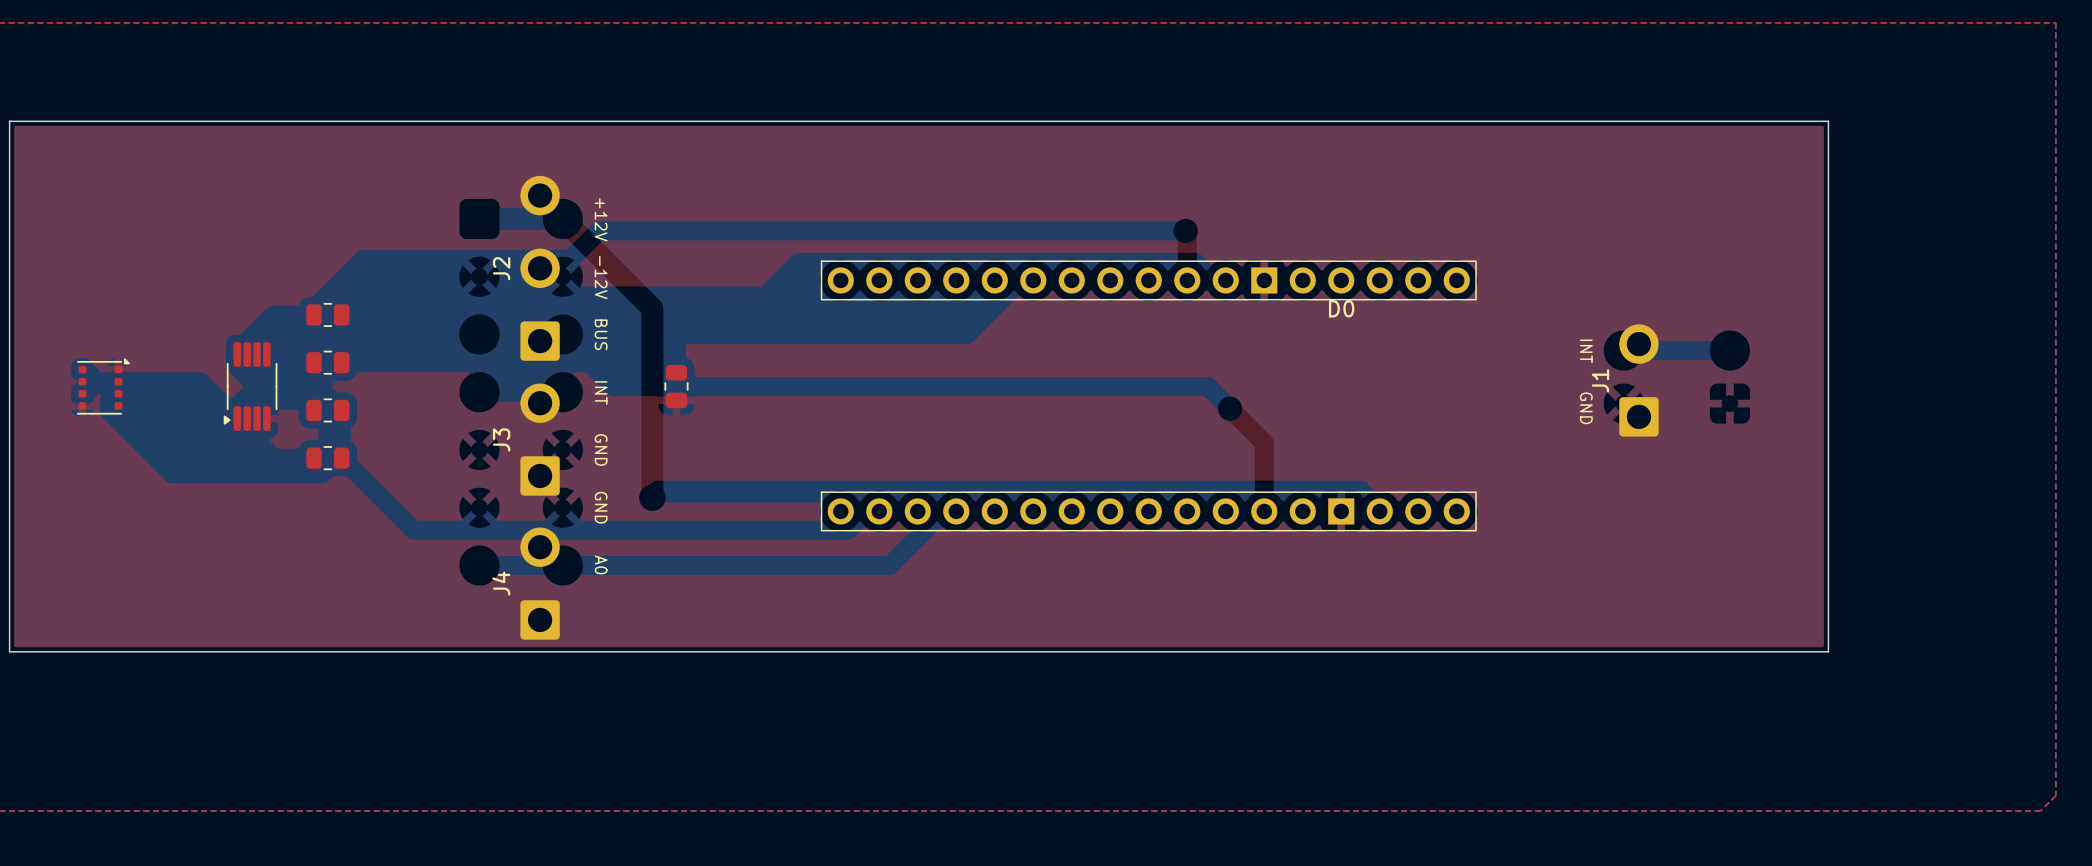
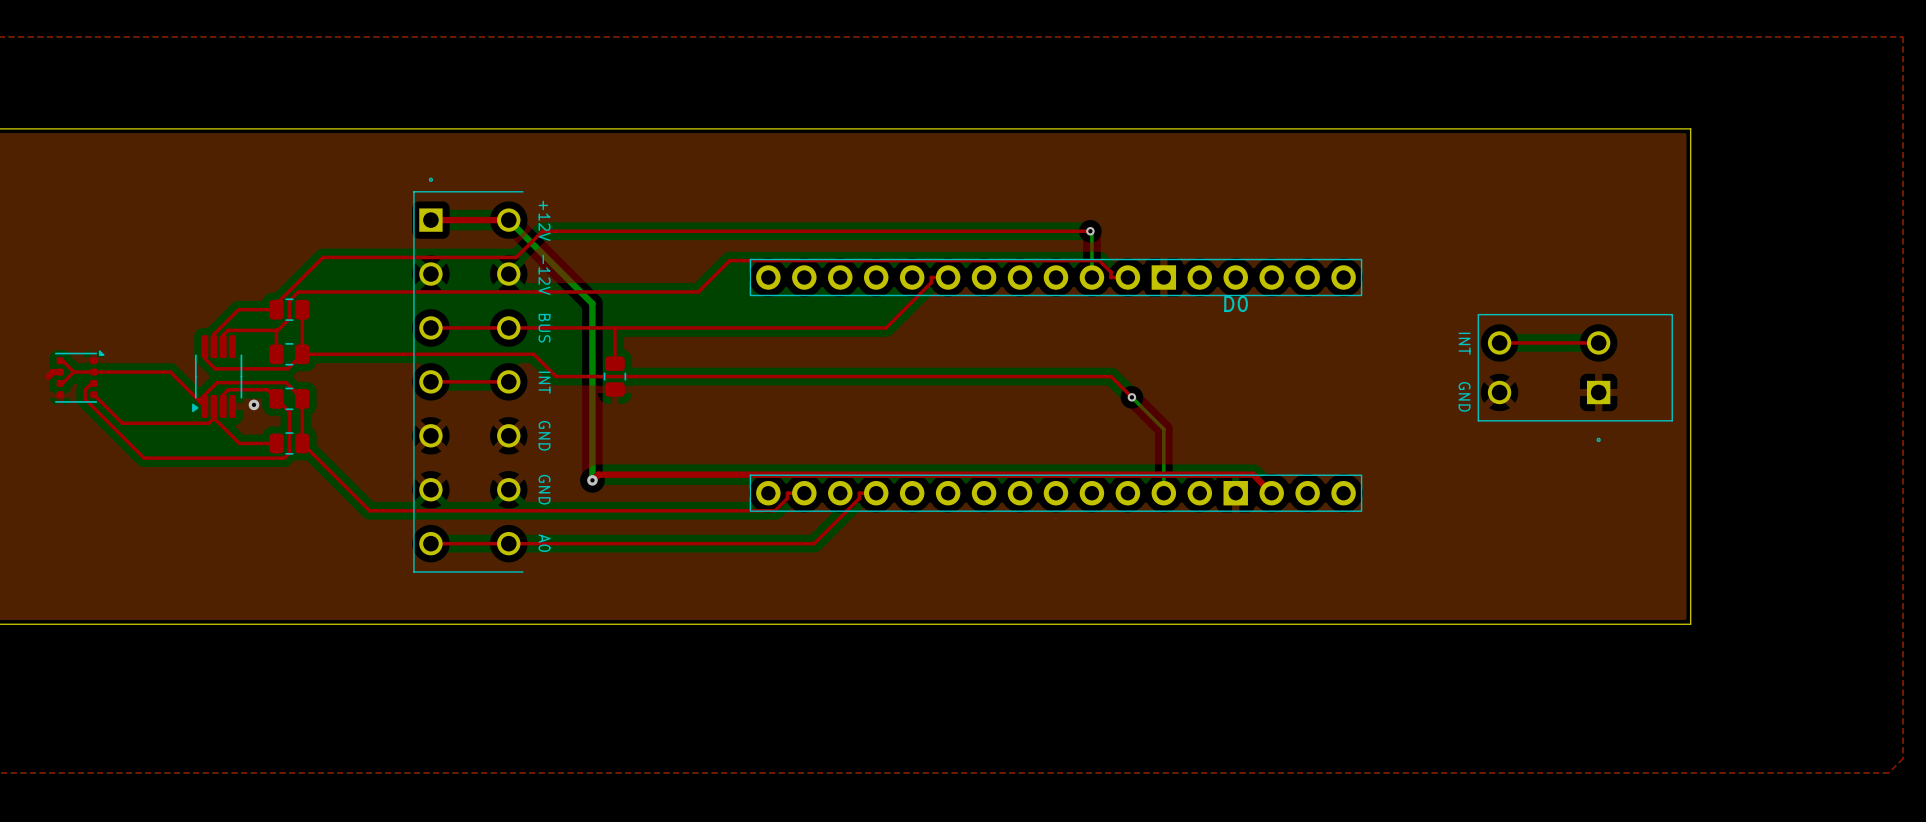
top track: none -> (430, 220) (508, 220)
bottom track: none -> (508, 220) (592, 303) (592, 480)
top track: none -> (1090, 231) (542, 231) (516, 257) (322, 257) (276, 303) (276, 309) (238, 309) (214, 334) (214, 346)
bottom track: none -> (1090, 231) (1091, 277)
via: none -> (1090, 231)
J2: (540, 268) -> none
top track: none -> (948, 277) (931, 277) (931, 282) (886, 327) (430, 327)
top track: none -> (1127, 277) (1111, 277) (1111, 272) (1099, 260) (729, 260) (698, 291) (298, 291) (289, 300) (289, 318) (277, 330) (228, 330) (223, 335) (223, 346)
top track: none -> (302, 309) (302, 354)
top track: none -> (614, 327) (614, 363)
top track: none -> (276, 330) (276, 354)
top track: none -> (1499, 342) (1598, 342)
top track: none -> (204, 346) (204, 358) (215, 368) (287, 368) (302, 354)
top track: none -> (302, 354) (533, 354) (556, 376) (1111, 376) (1131, 397)
top track: none -> (60, 360) (73, 372)
J1: (1638, 380) -> none
top track: none -> (60, 372) (53, 372) (48, 376)
top track: none -> (73, 372) (170, 372) (204, 406)
top track: none -> (73, 372) (60, 383)
part: none -> (468, 375)
part: none -> (1575, 377)
top track: none -> (430, 381) (508, 381)
top track: none -> (93, 383) (85, 390) (85, 399) (144, 458) (284, 458) (289, 453) (289, 411) (267, 389) (228, 389) (223, 394) (223, 406)
top track: none -> (93, 394) (122, 423) (208, 423) (214, 418)
bottom track: none -> (1131, 397) (1163, 429) (1163, 493)
via: none -> (1131, 397)
top track: none -> (199, 400) (217, 382) (286, 382) (302, 398) (302, 443) (369, 510) (775, 510) (787, 498) (787, 493) (804, 493)
via: none -> (253, 404)
top track: none -> (214, 418) (239, 443) (276, 443)
J3: (540, 439) -> none
top track: none -> (592, 480) (598, 474) (1253, 474) (1271, 493)
via: none -> (592, 480)
top track: none -> (876, 493) (859, 493) (859, 498) (814, 543) (430, 543)
J4: (540, 583) -> none

